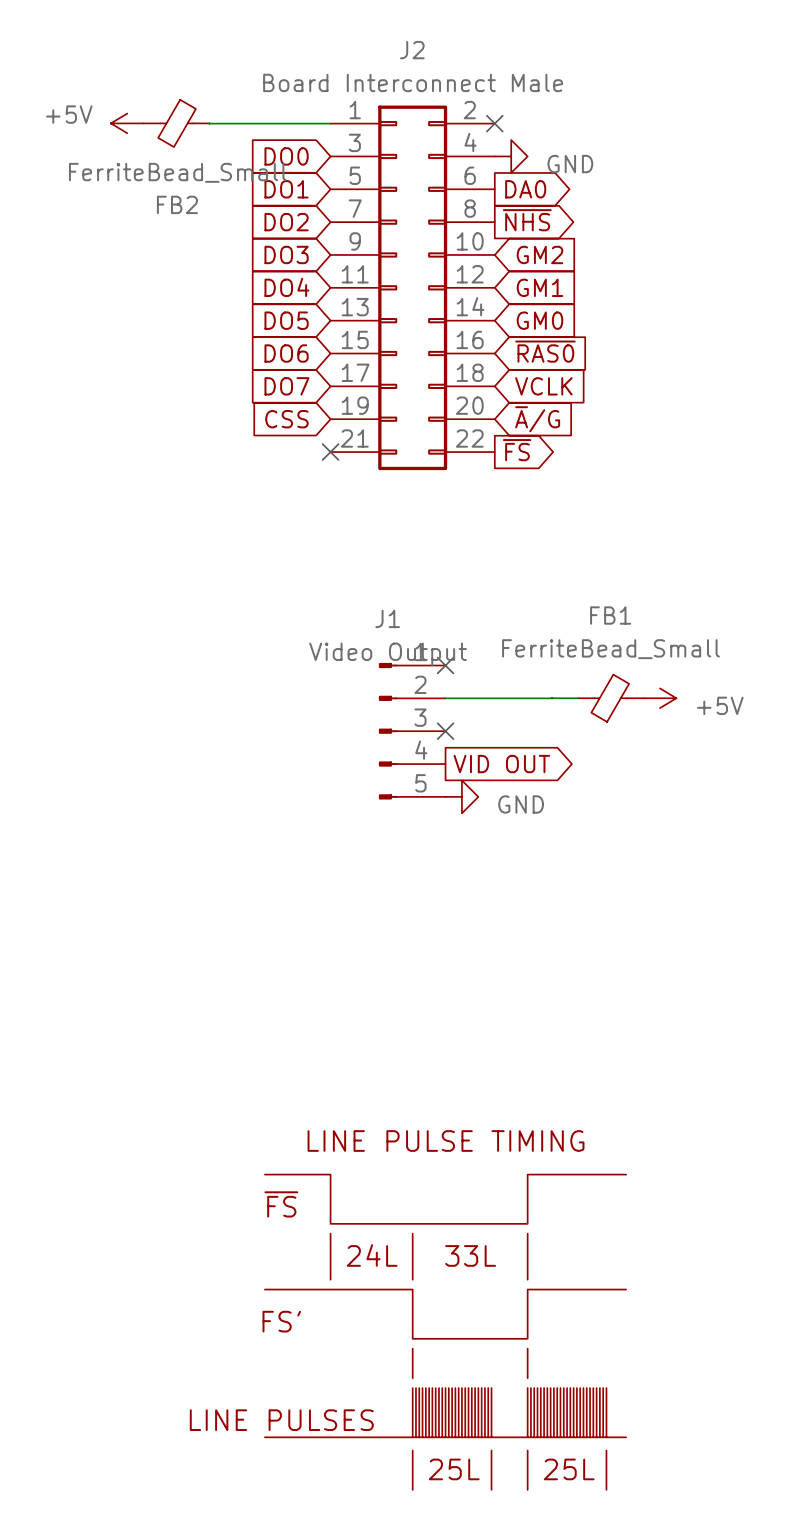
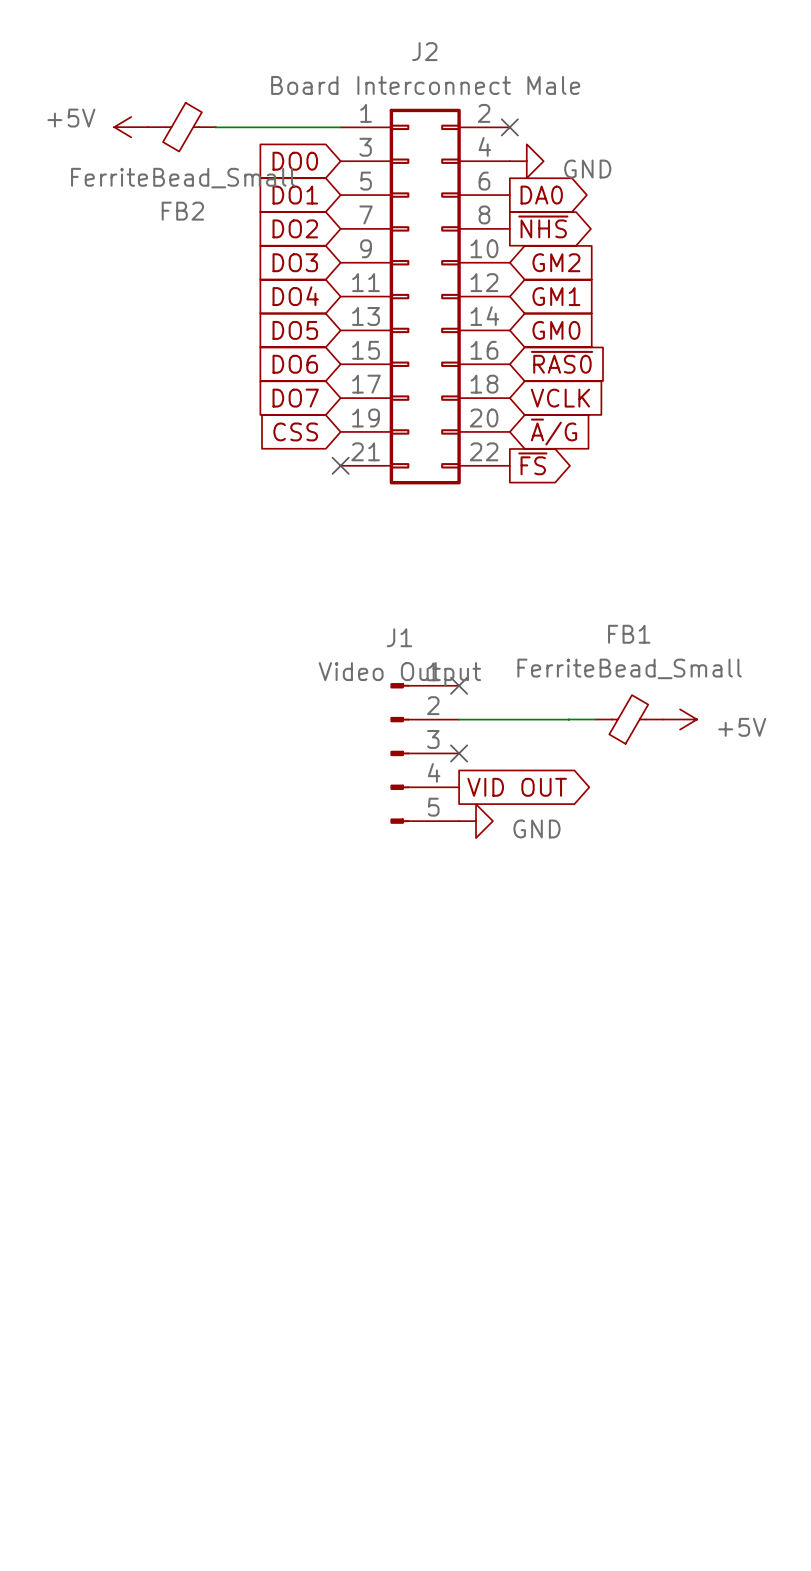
part: (445, 1332) -> none

